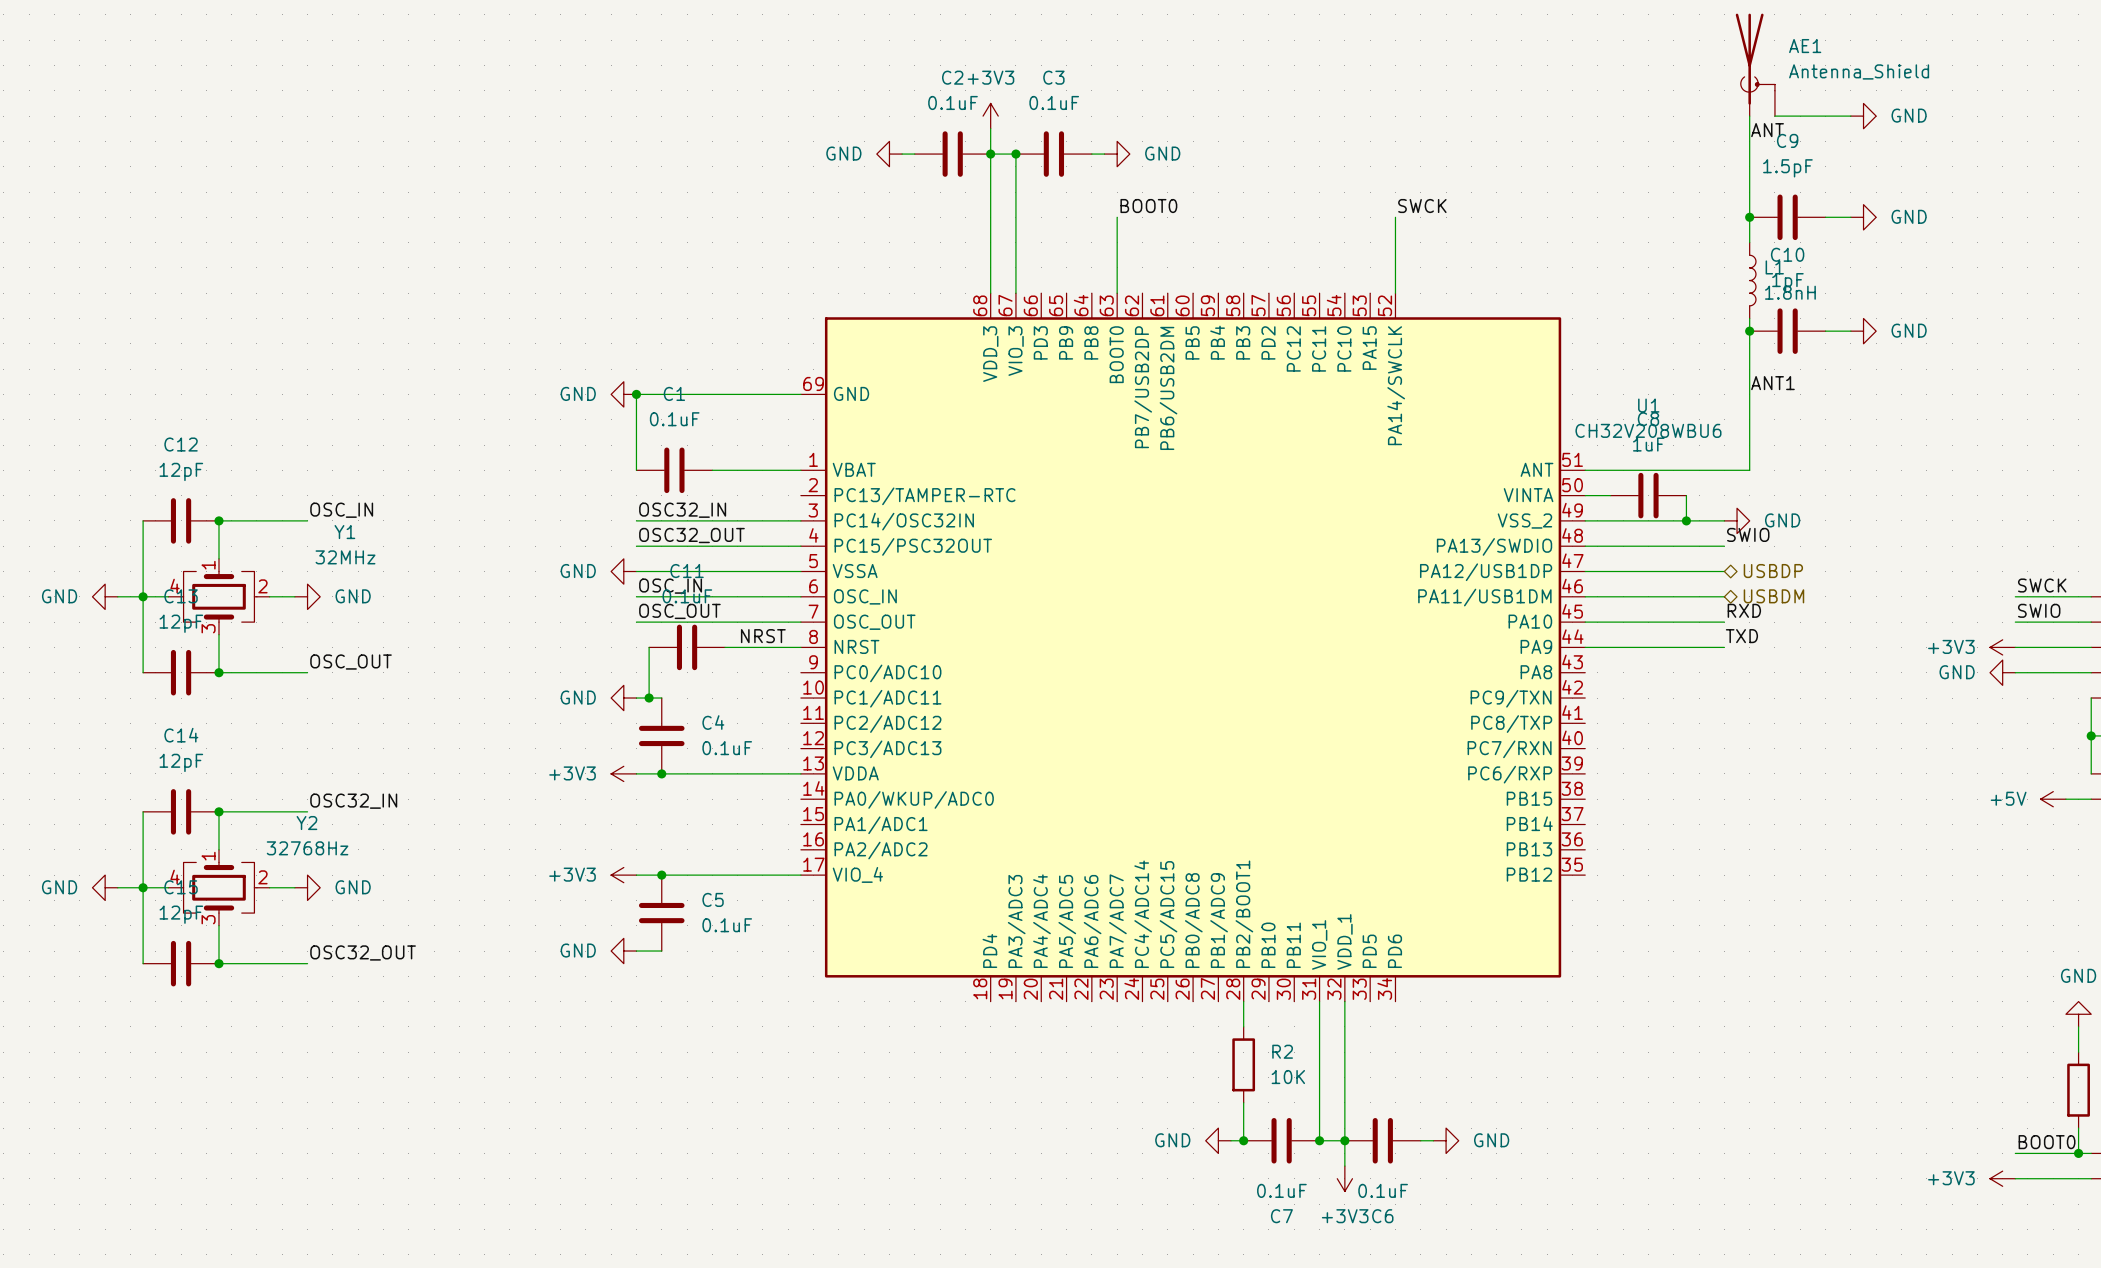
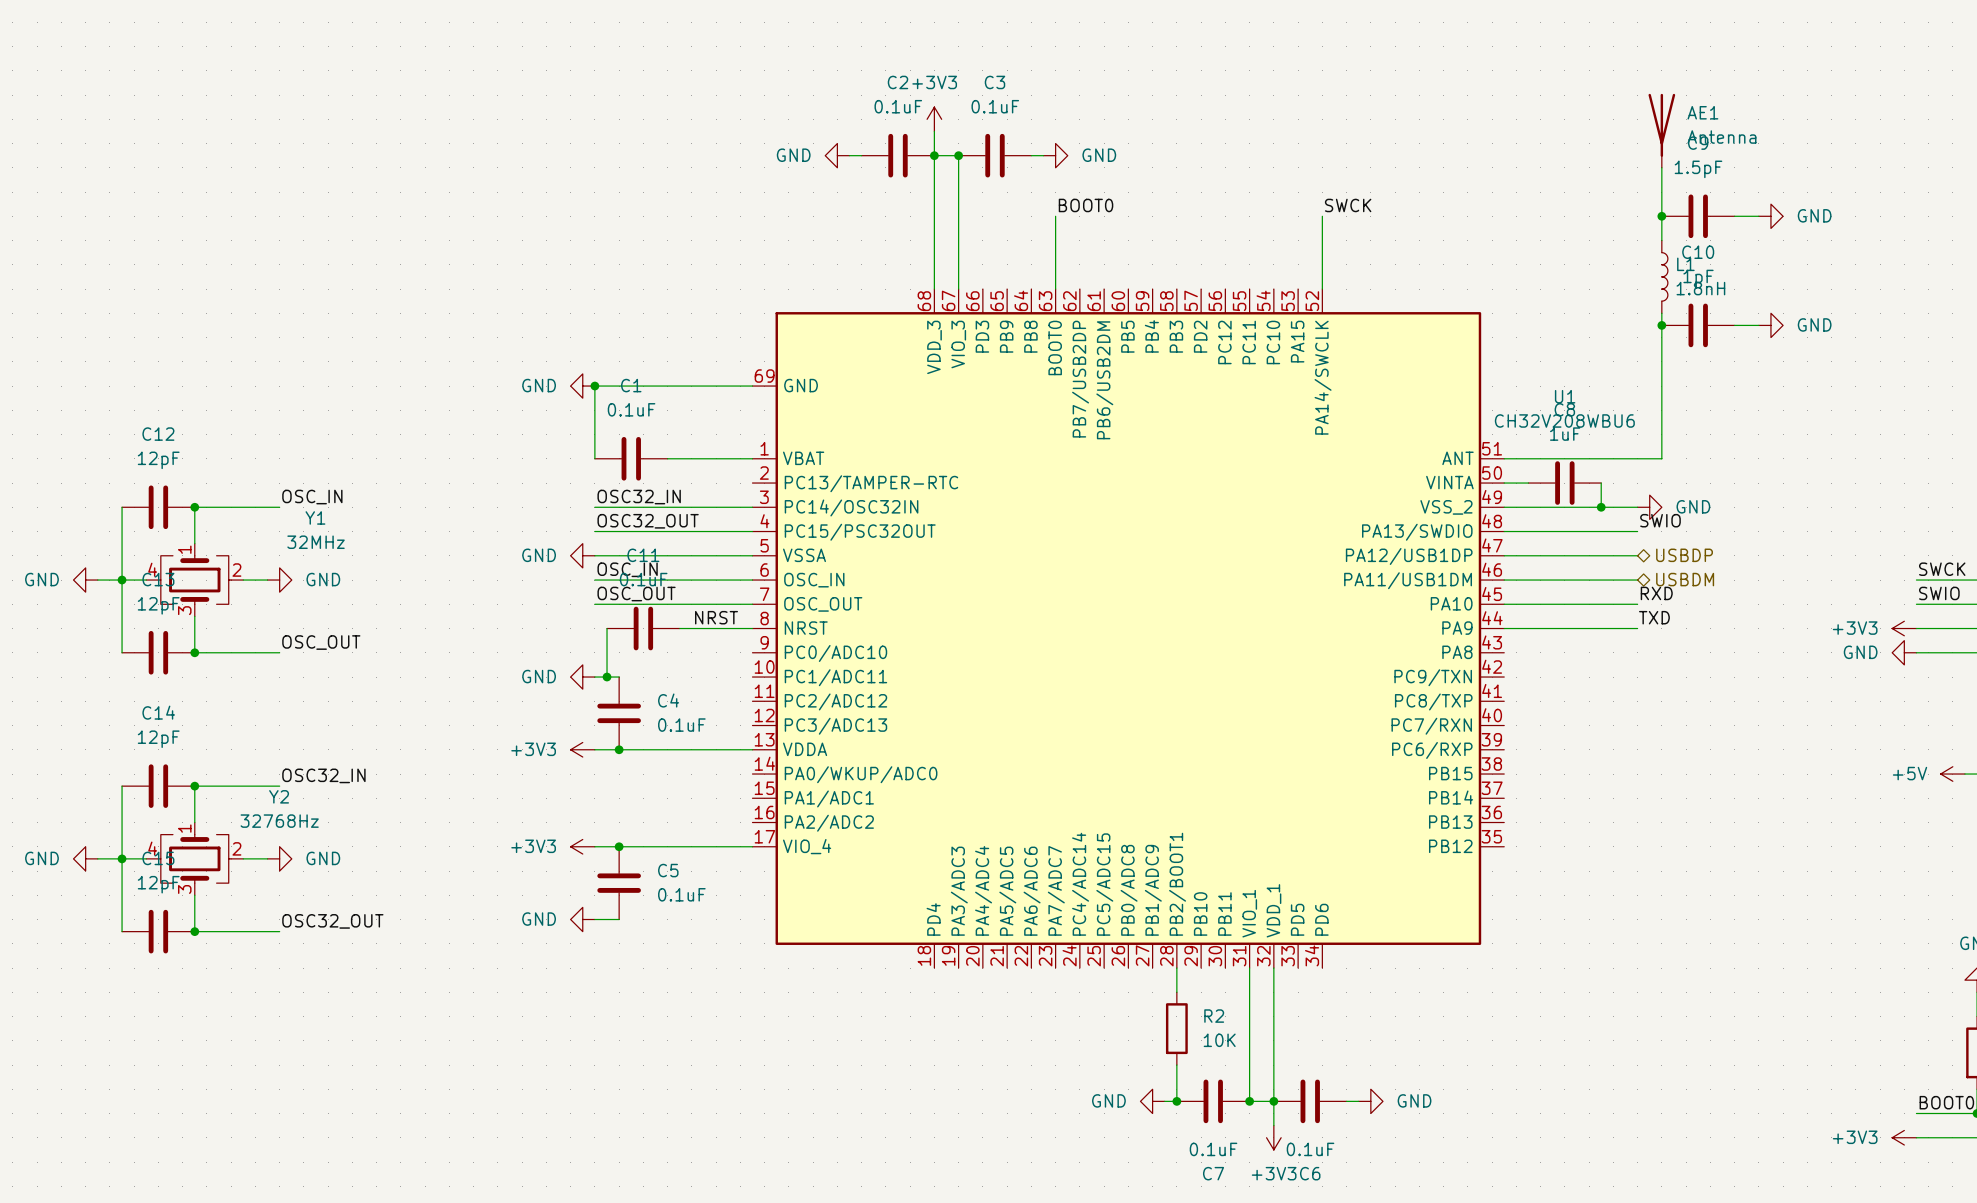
AE1 symbol: [1735, 13, 1775, 117] -> [1648, 93, 1676, 168]
AE1 value: Antenna_Shield (1859, 71) -> Antenna (1721, 137)
wire: (1774, 116) (1850, 116) -> none
power symbol: GND (1863, 116) -> none
label: ANT (1767, 130) -> none
label: ANT1 (1772, 383) -> none

